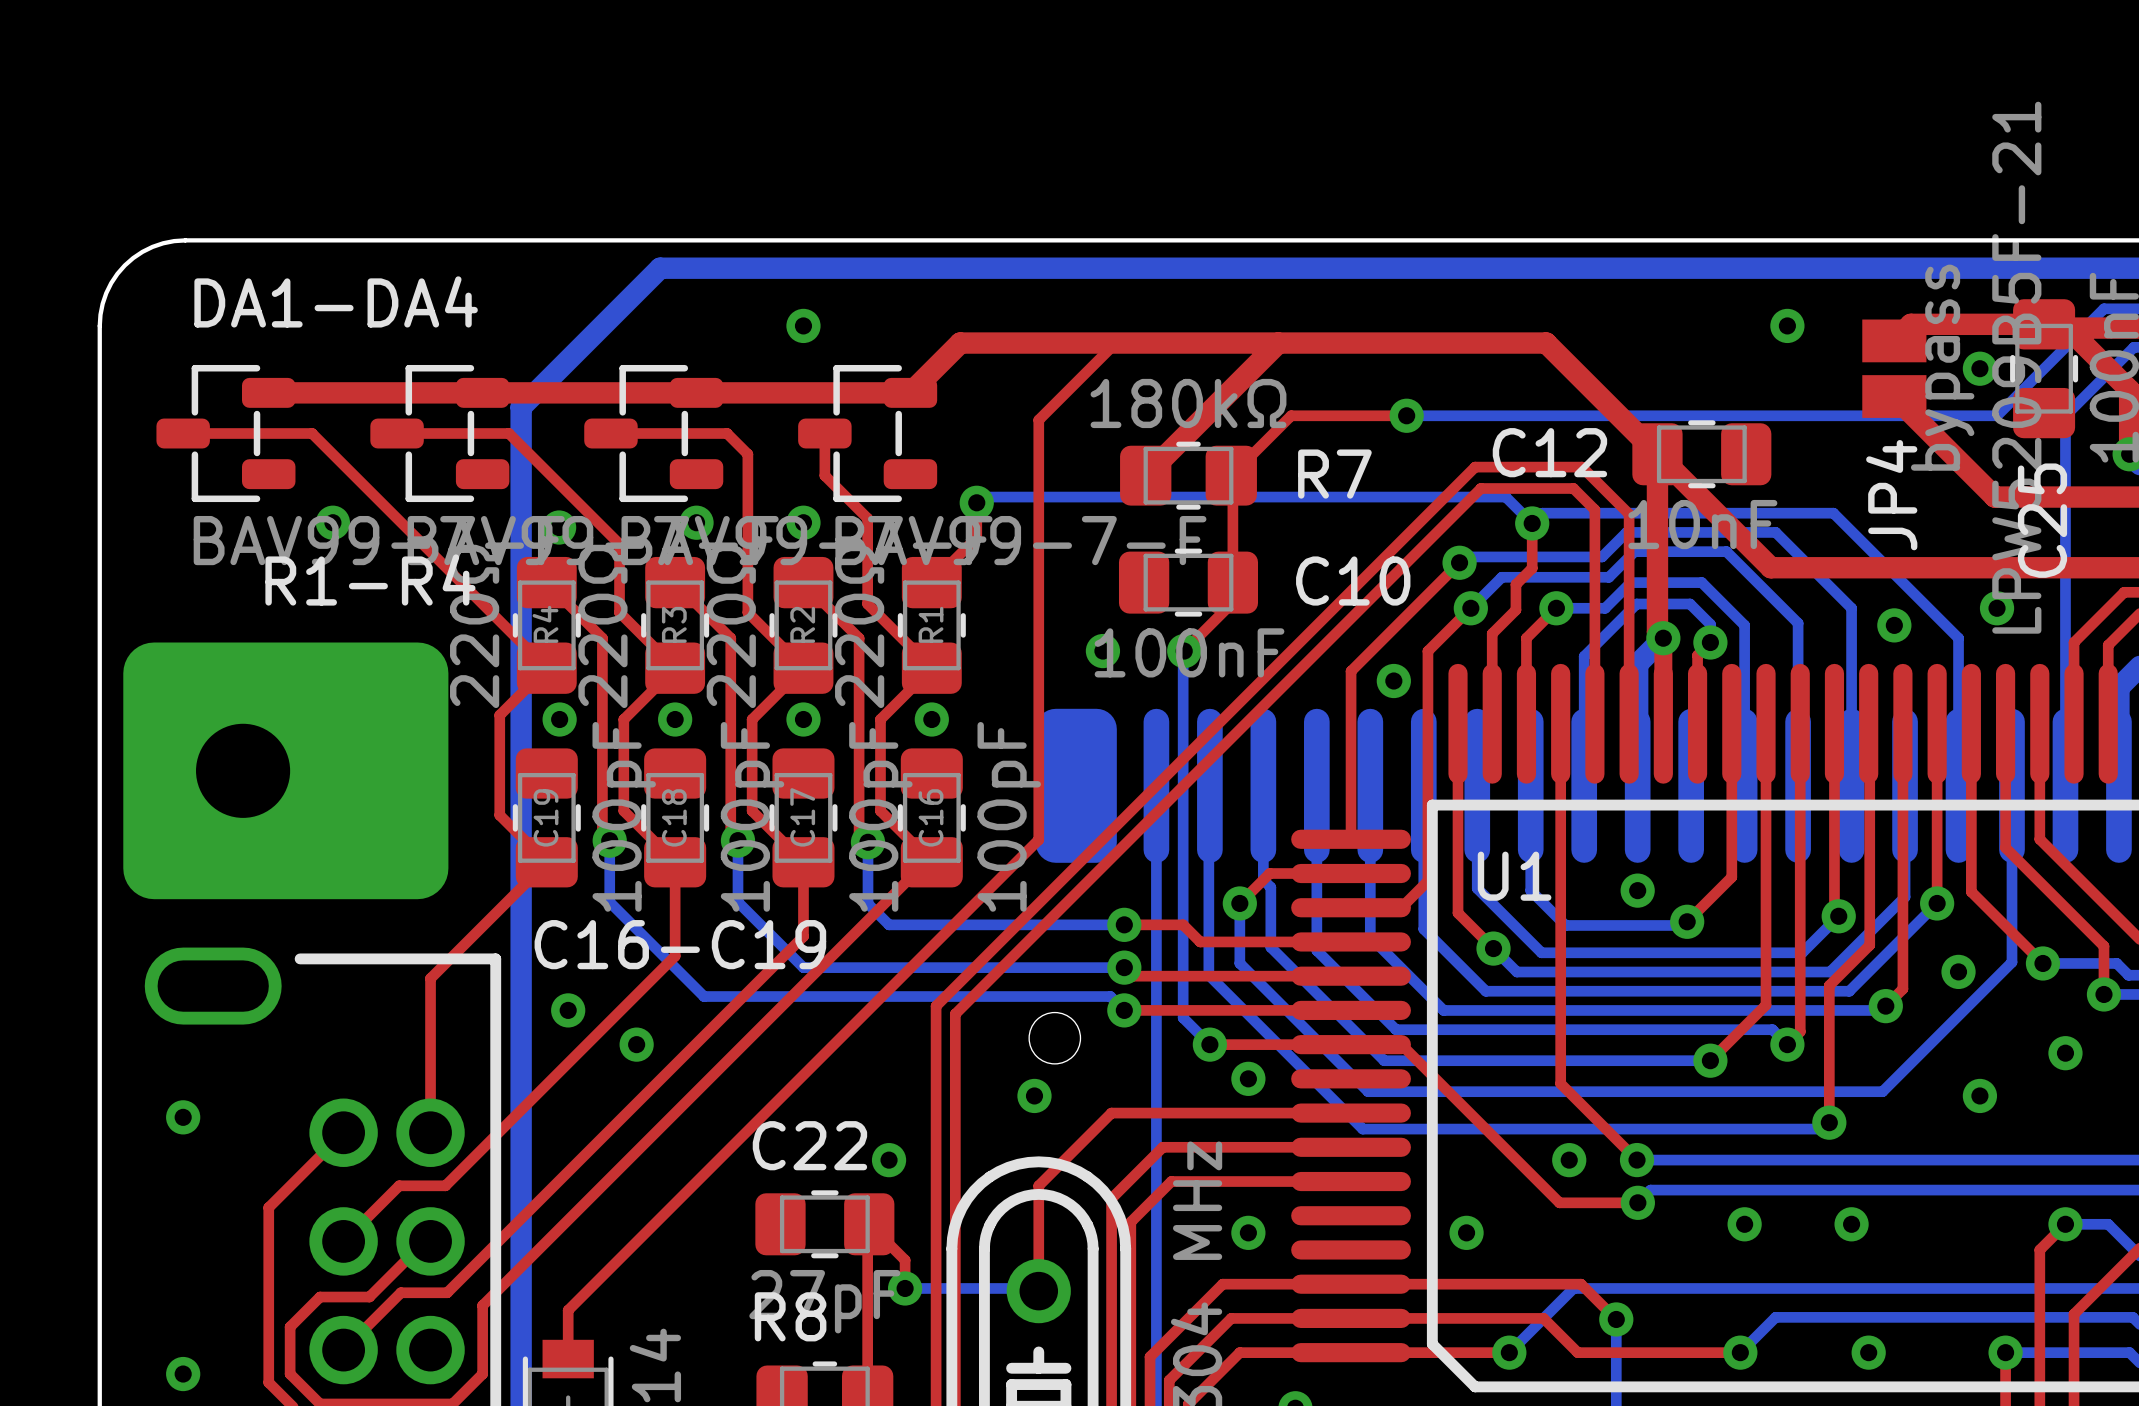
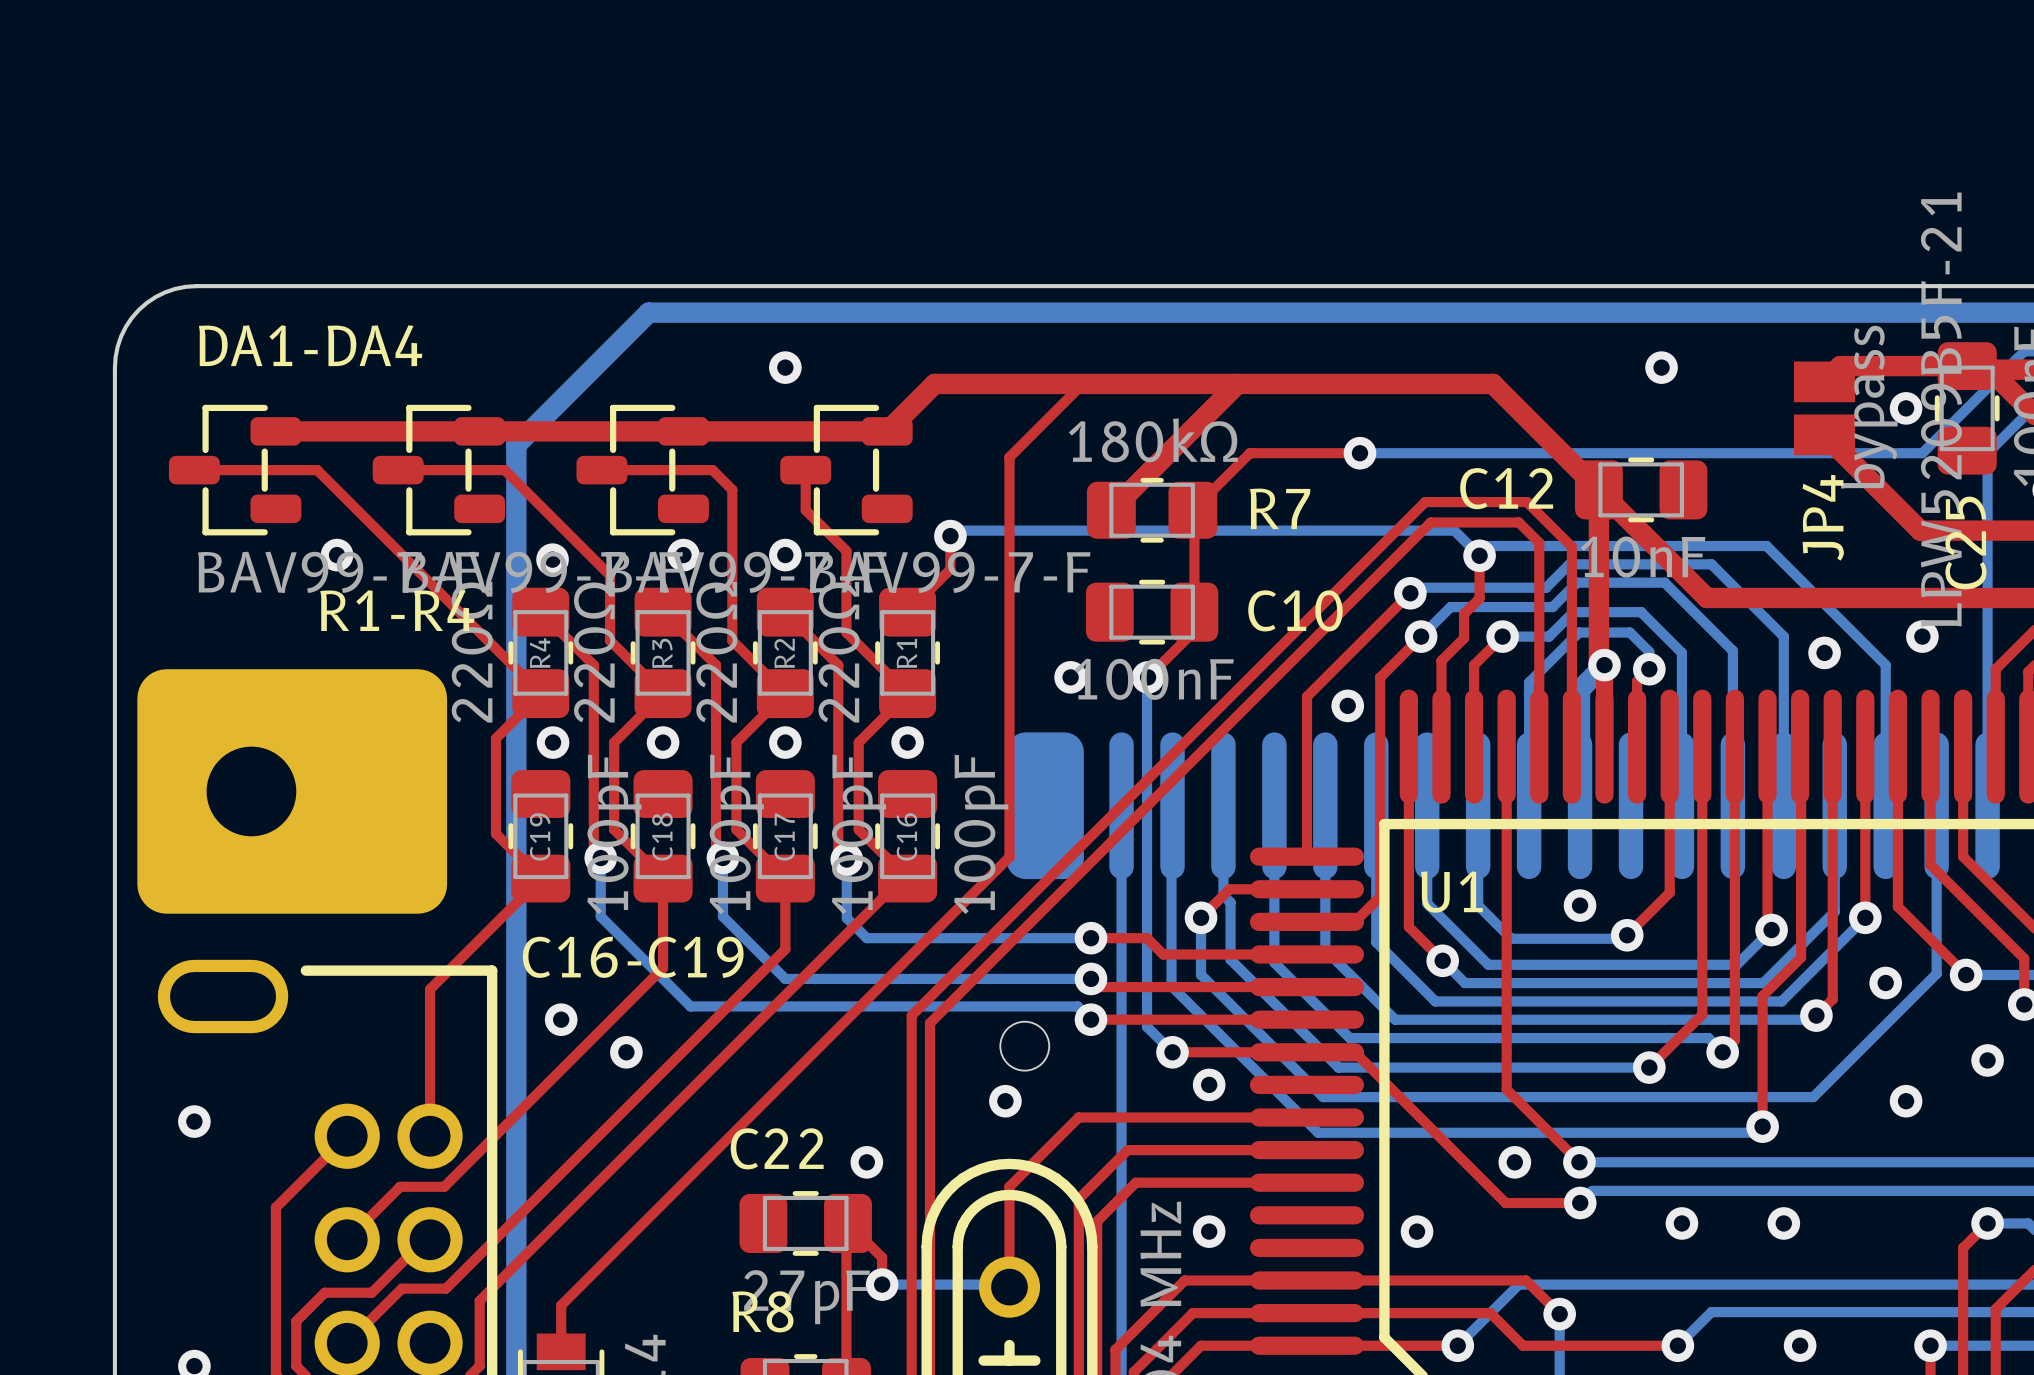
via position: (1787, 325) -> (1661, 367)

